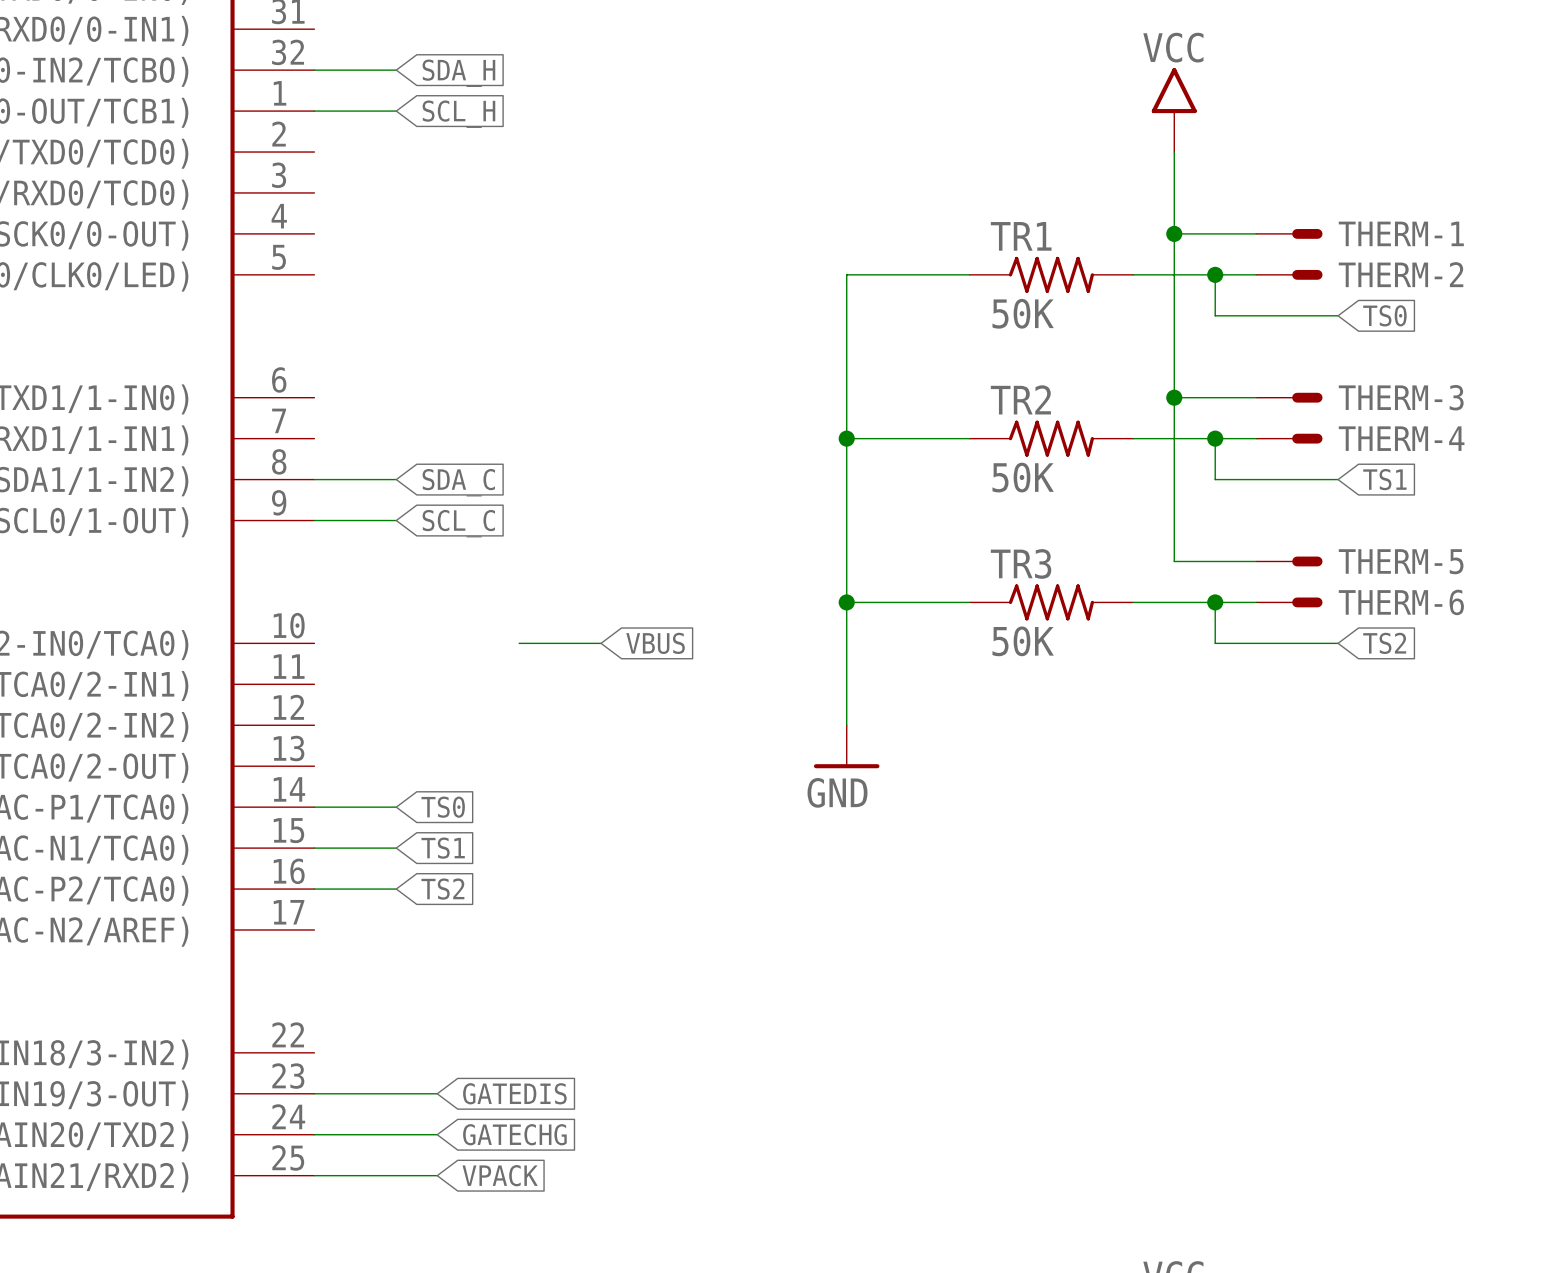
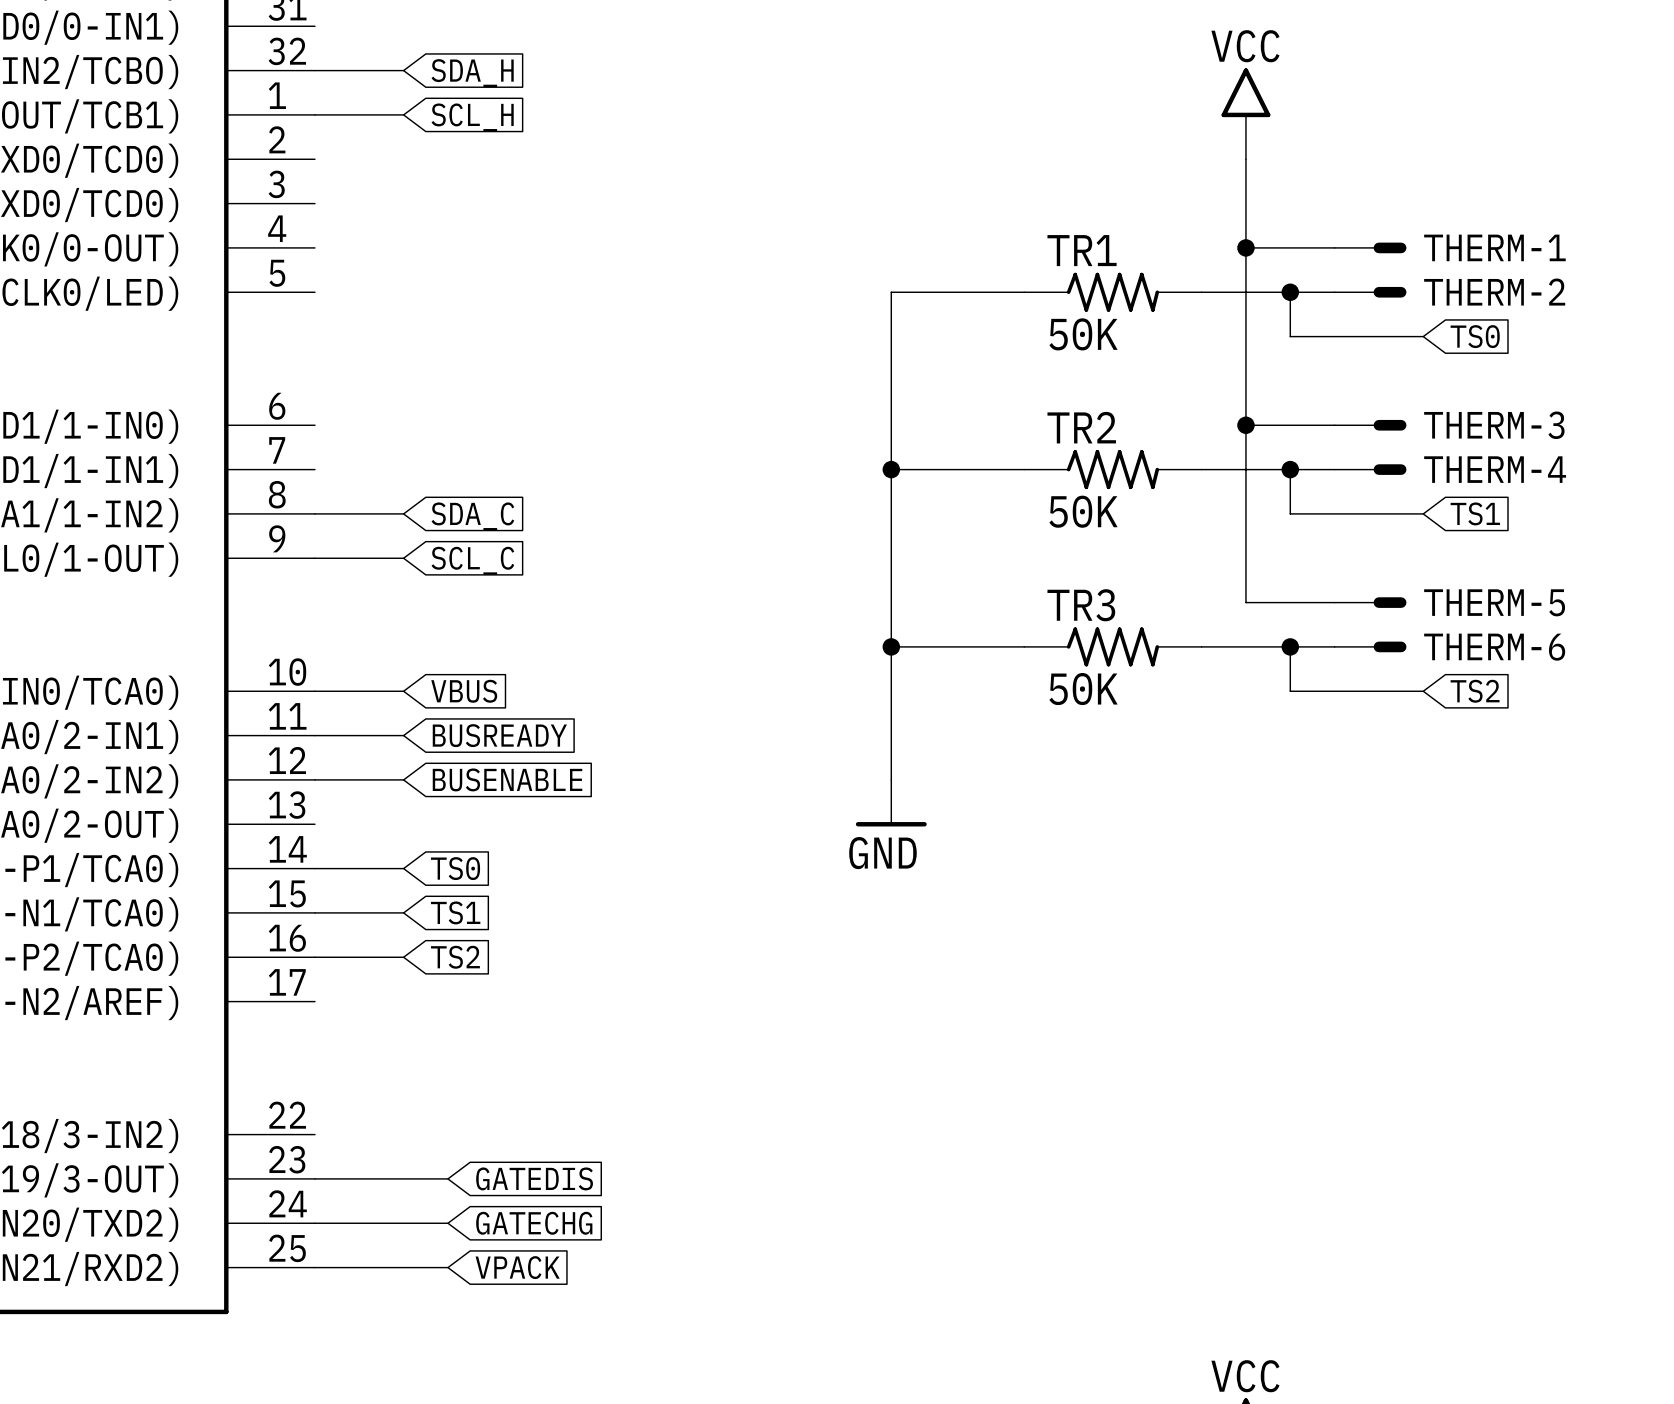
wire: (519, 643) (601, 643) -> (314, 691) (403, 691)
global label position: VBUS (655, 643) -> VBUS (464, 691)
wire: none -> (314, 735) (403, 735)
global label: none -> BUSREADY (499, 735)
wire: none -> (314, 779) (403, 779)
global label: none -> BUSENABLE (507, 779)

